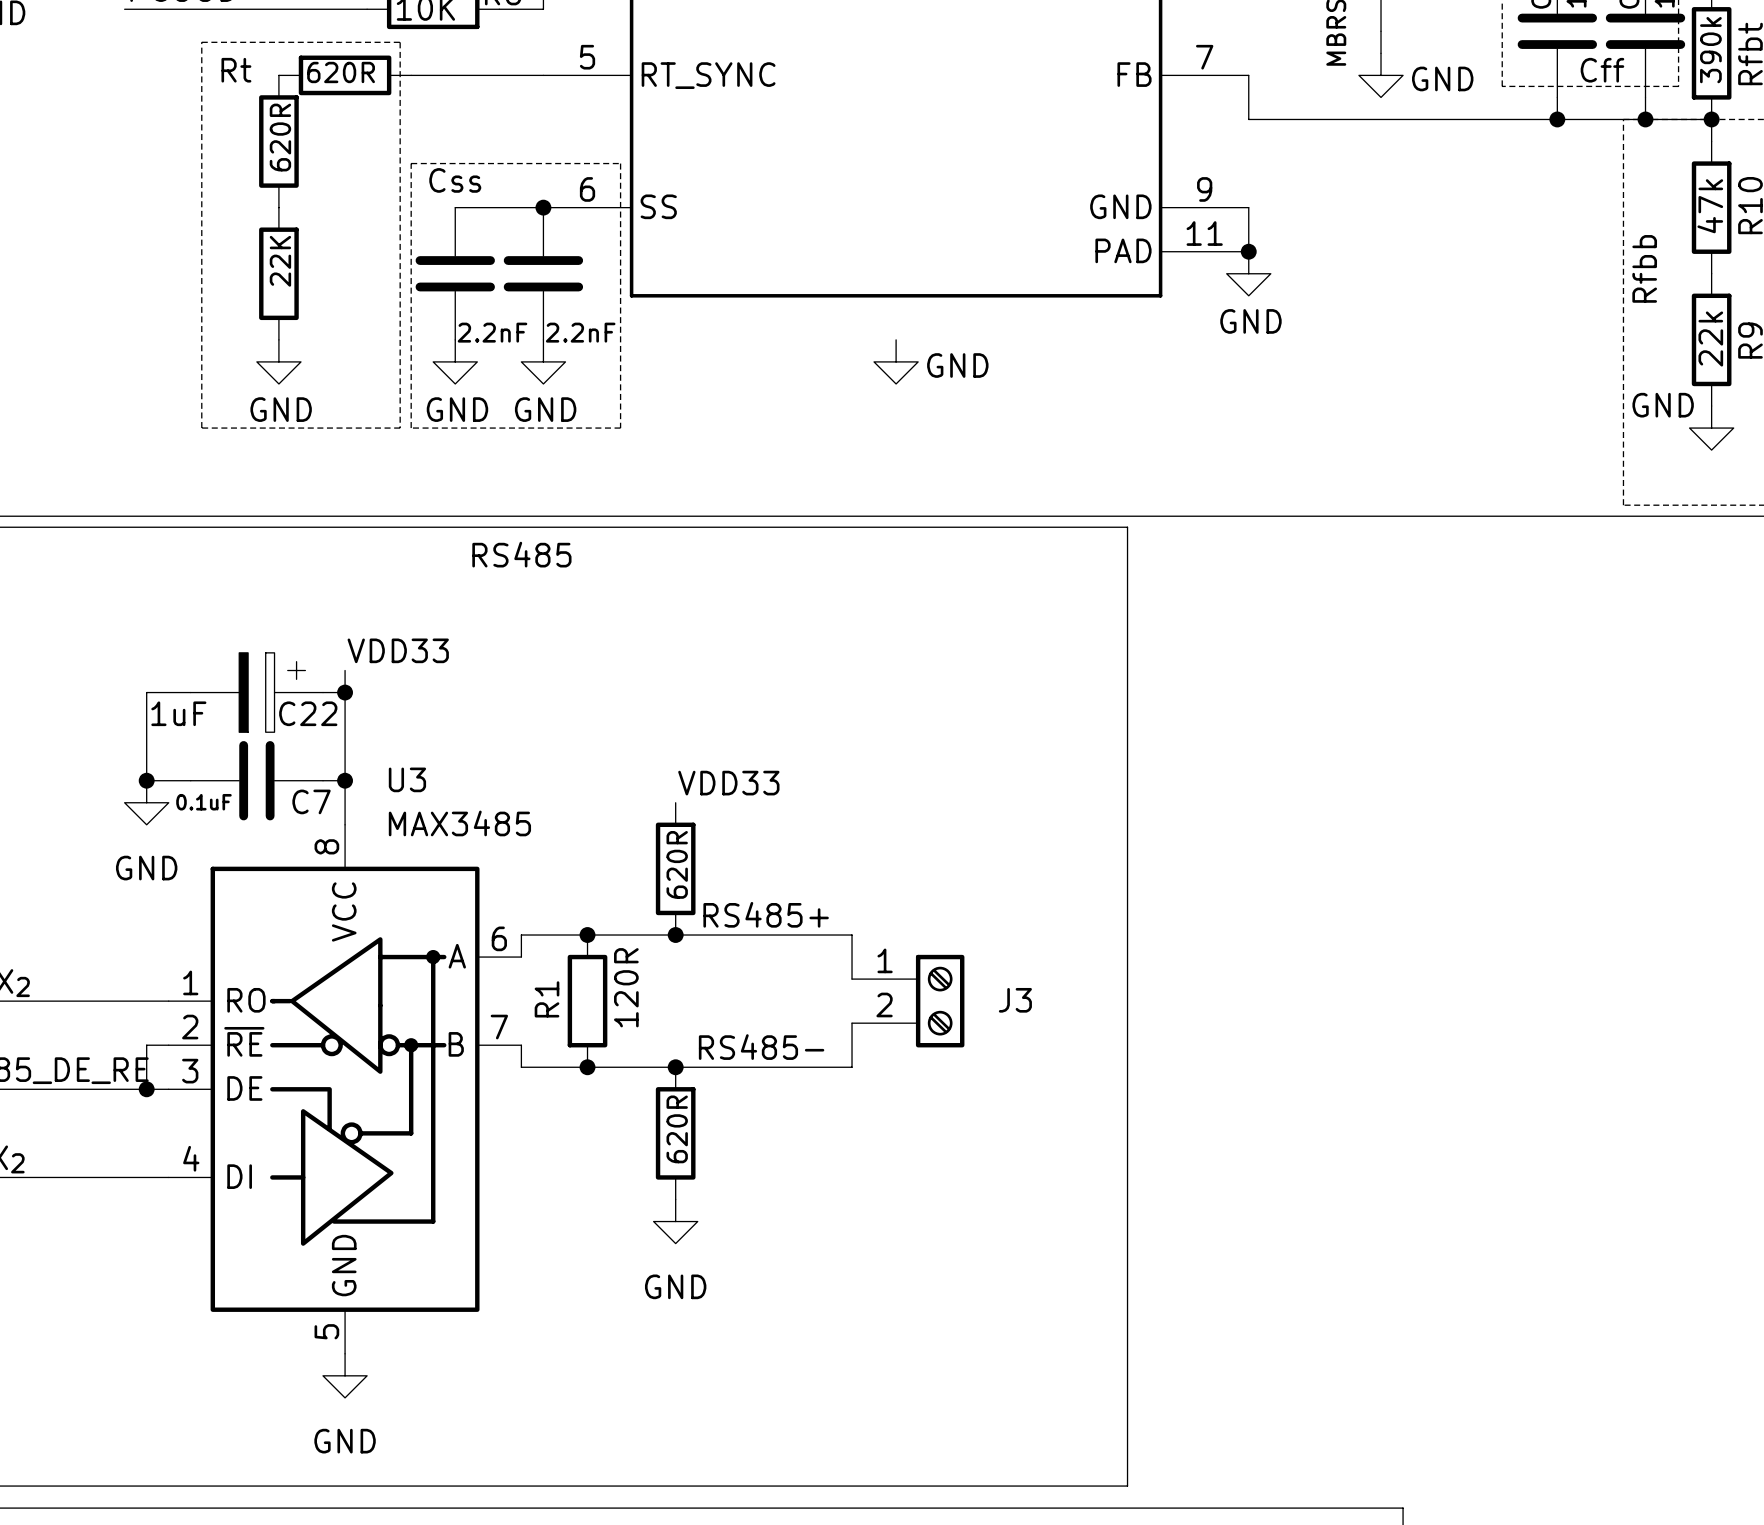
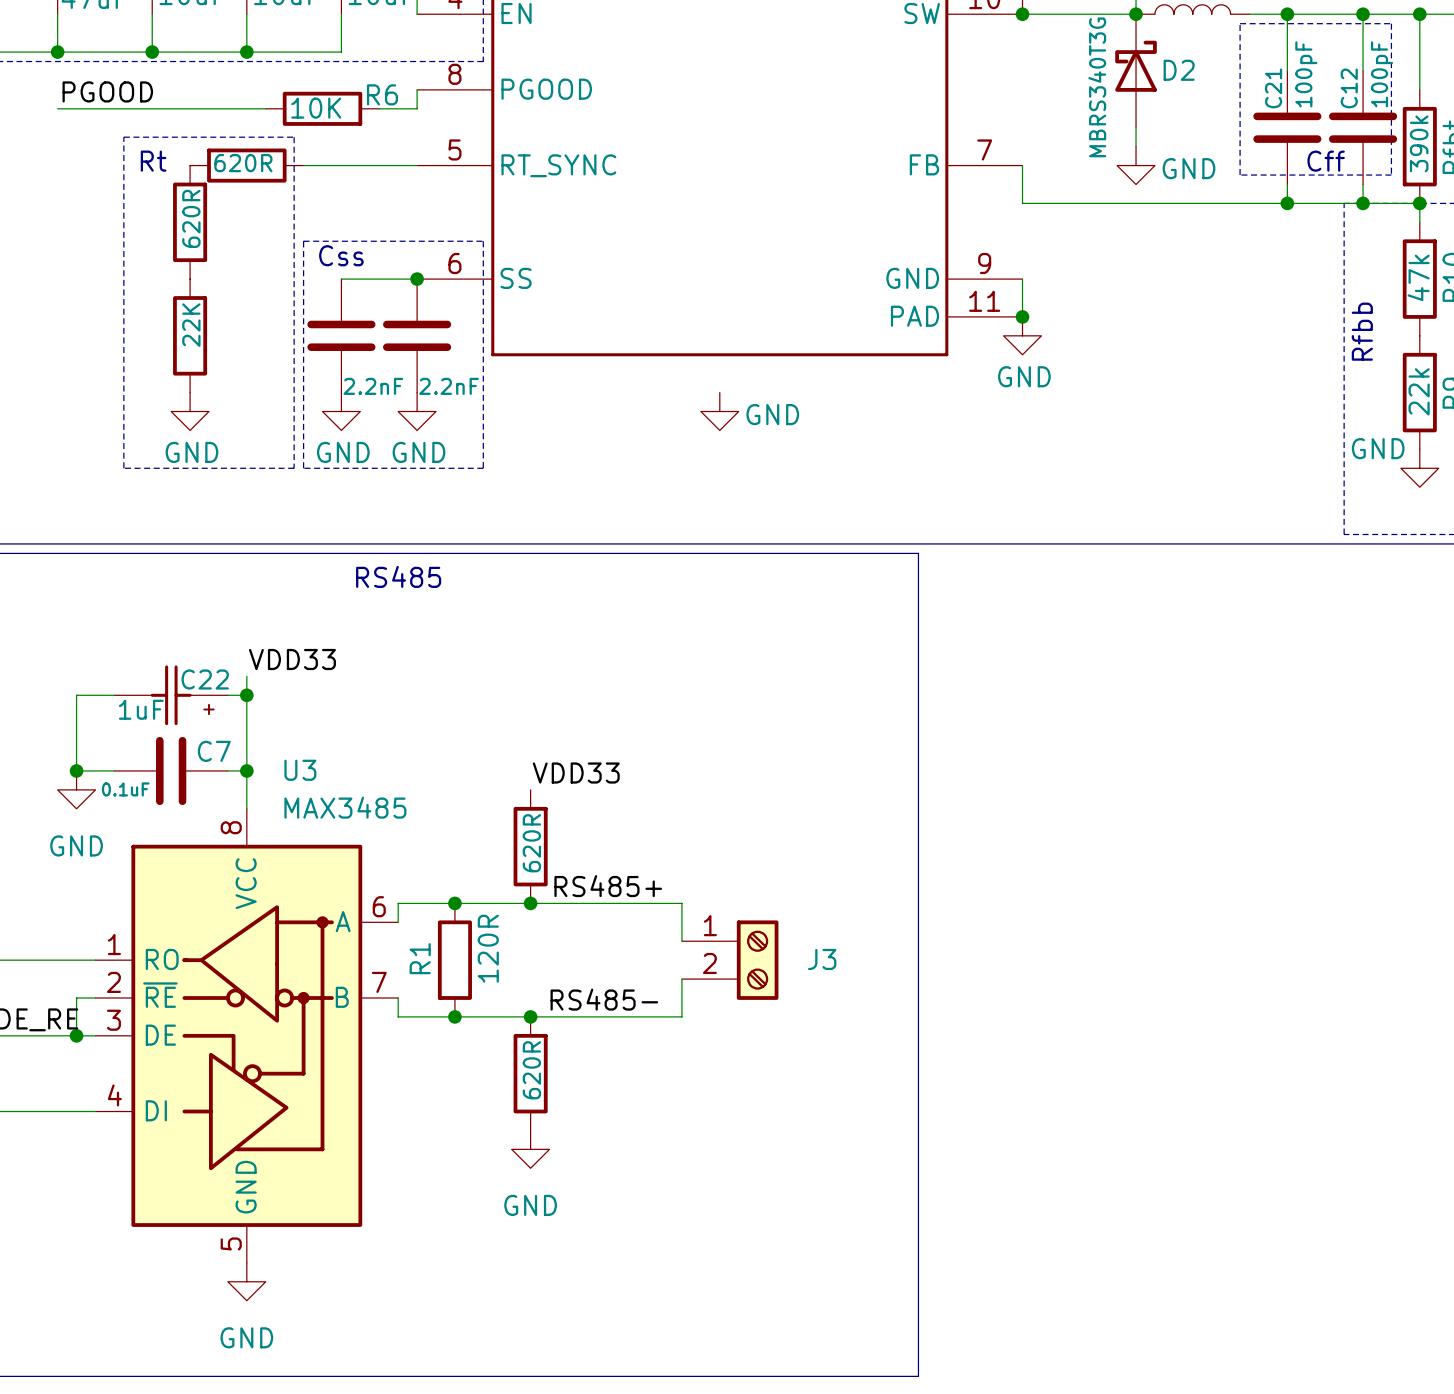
C22 symbol: [190, 652, 324, 733] -> [114, 665, 228, 726]
C22 value position: 1uF (178, 713) -> 1uF (141, 709)
C22 name position: C22 (308, 713) -> C22 (205, 679)
C7 name position: C7 (311, 801) -> C7 (214, 751)

